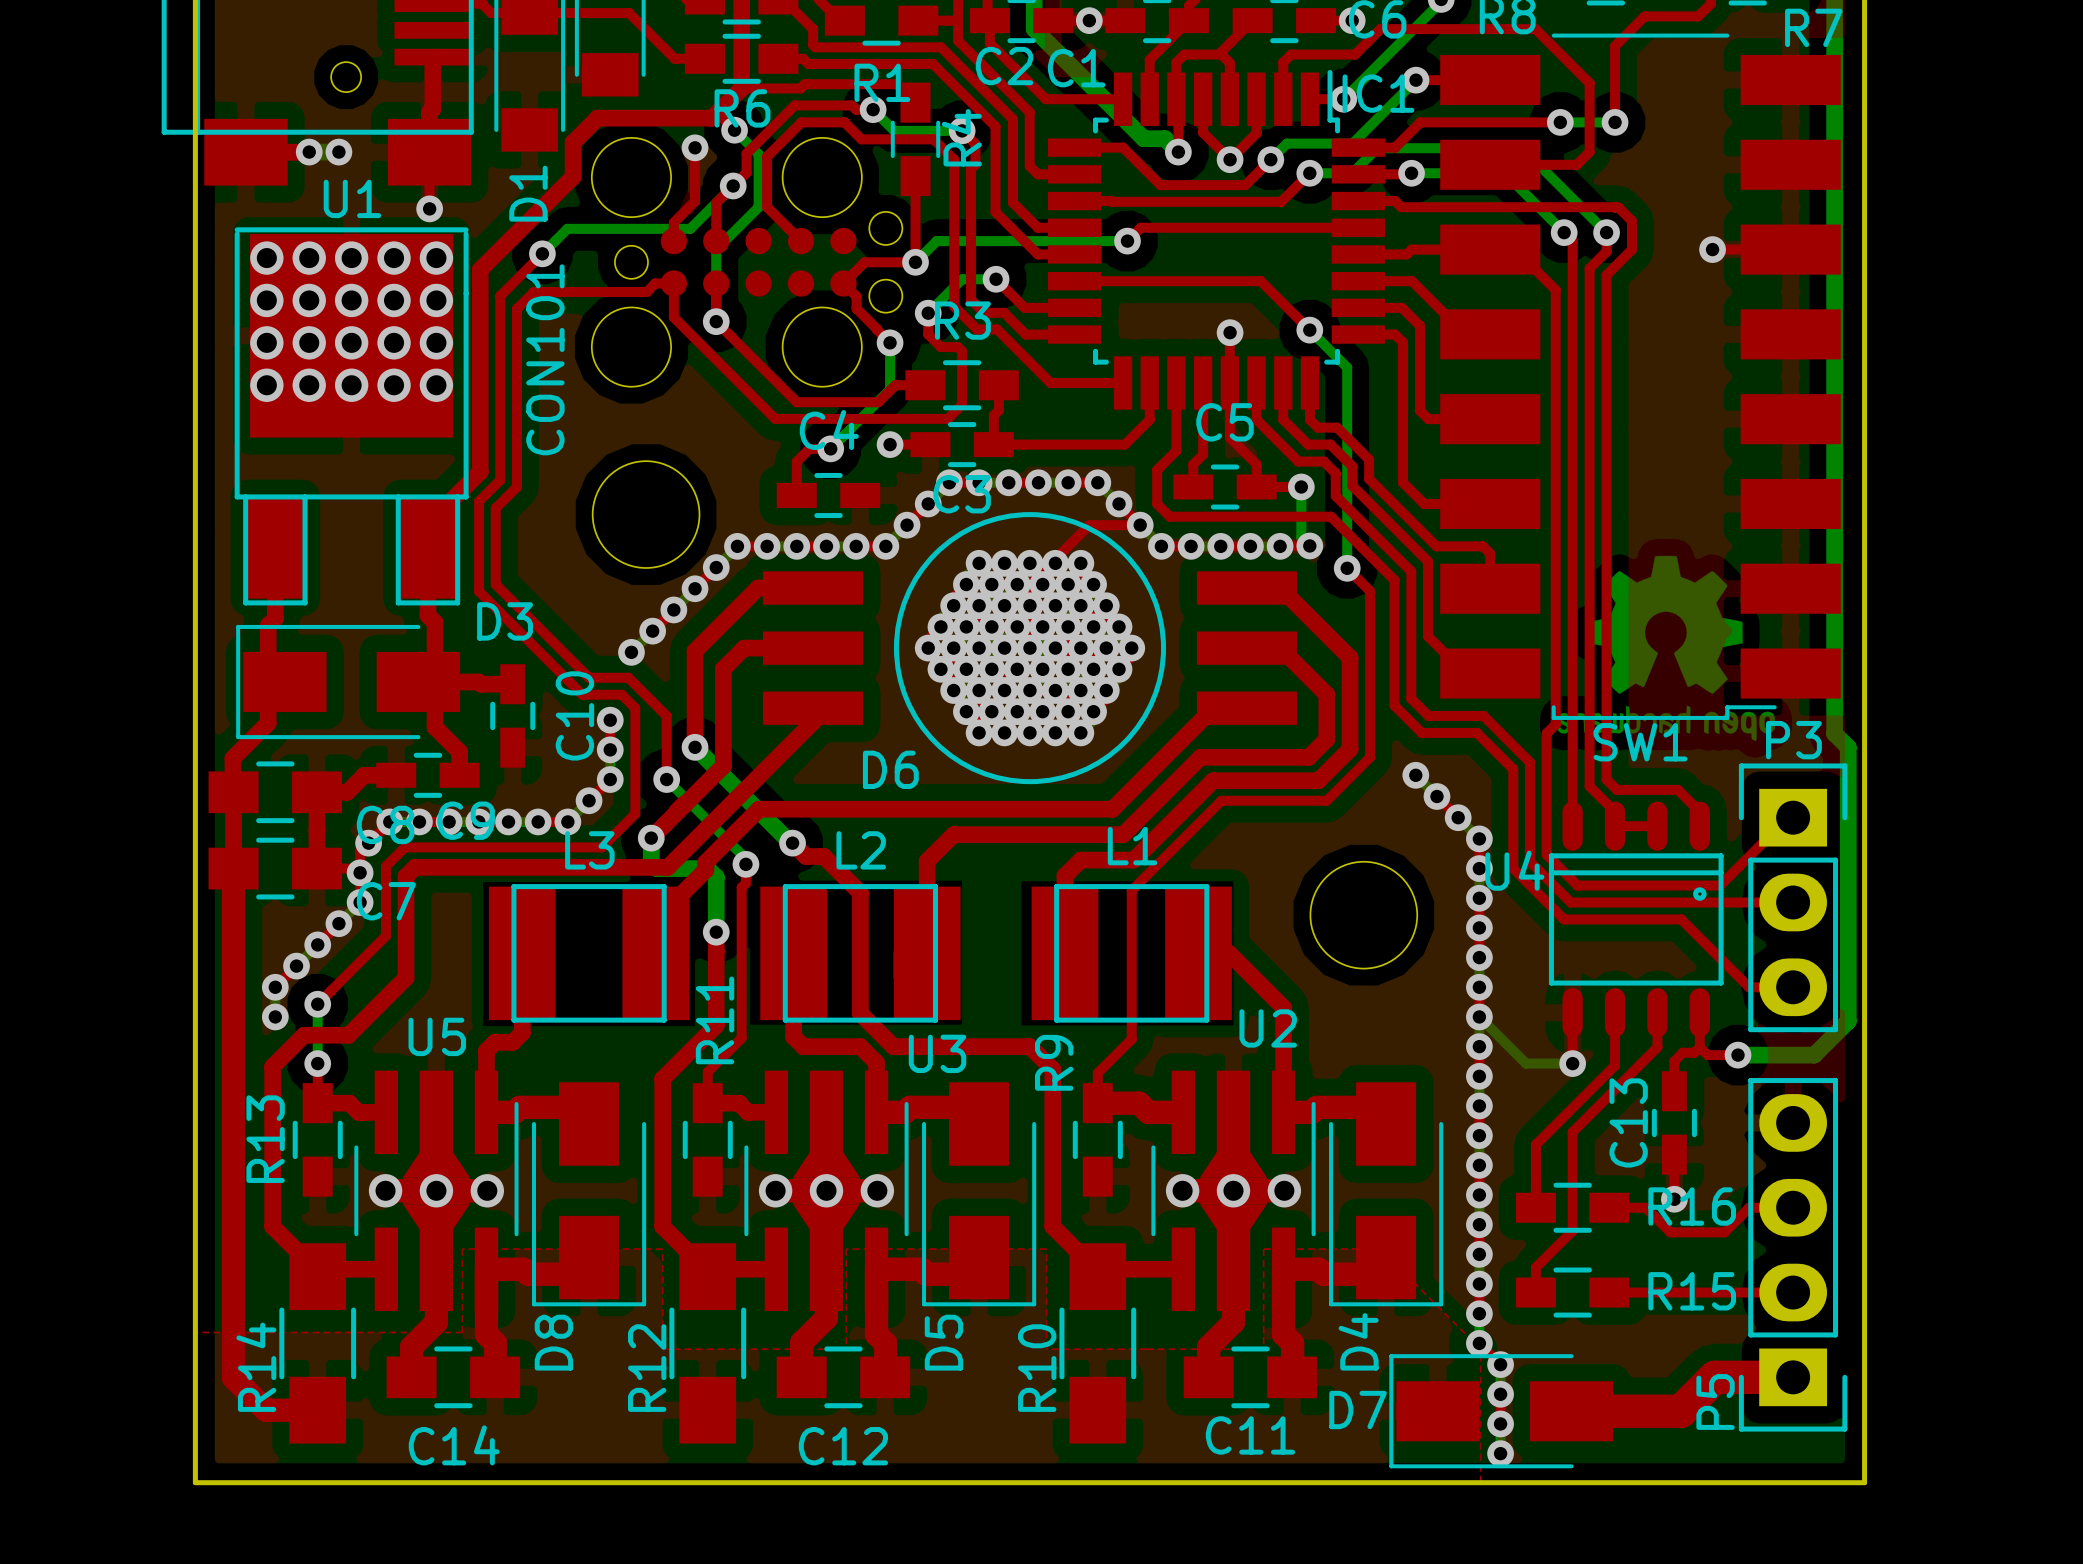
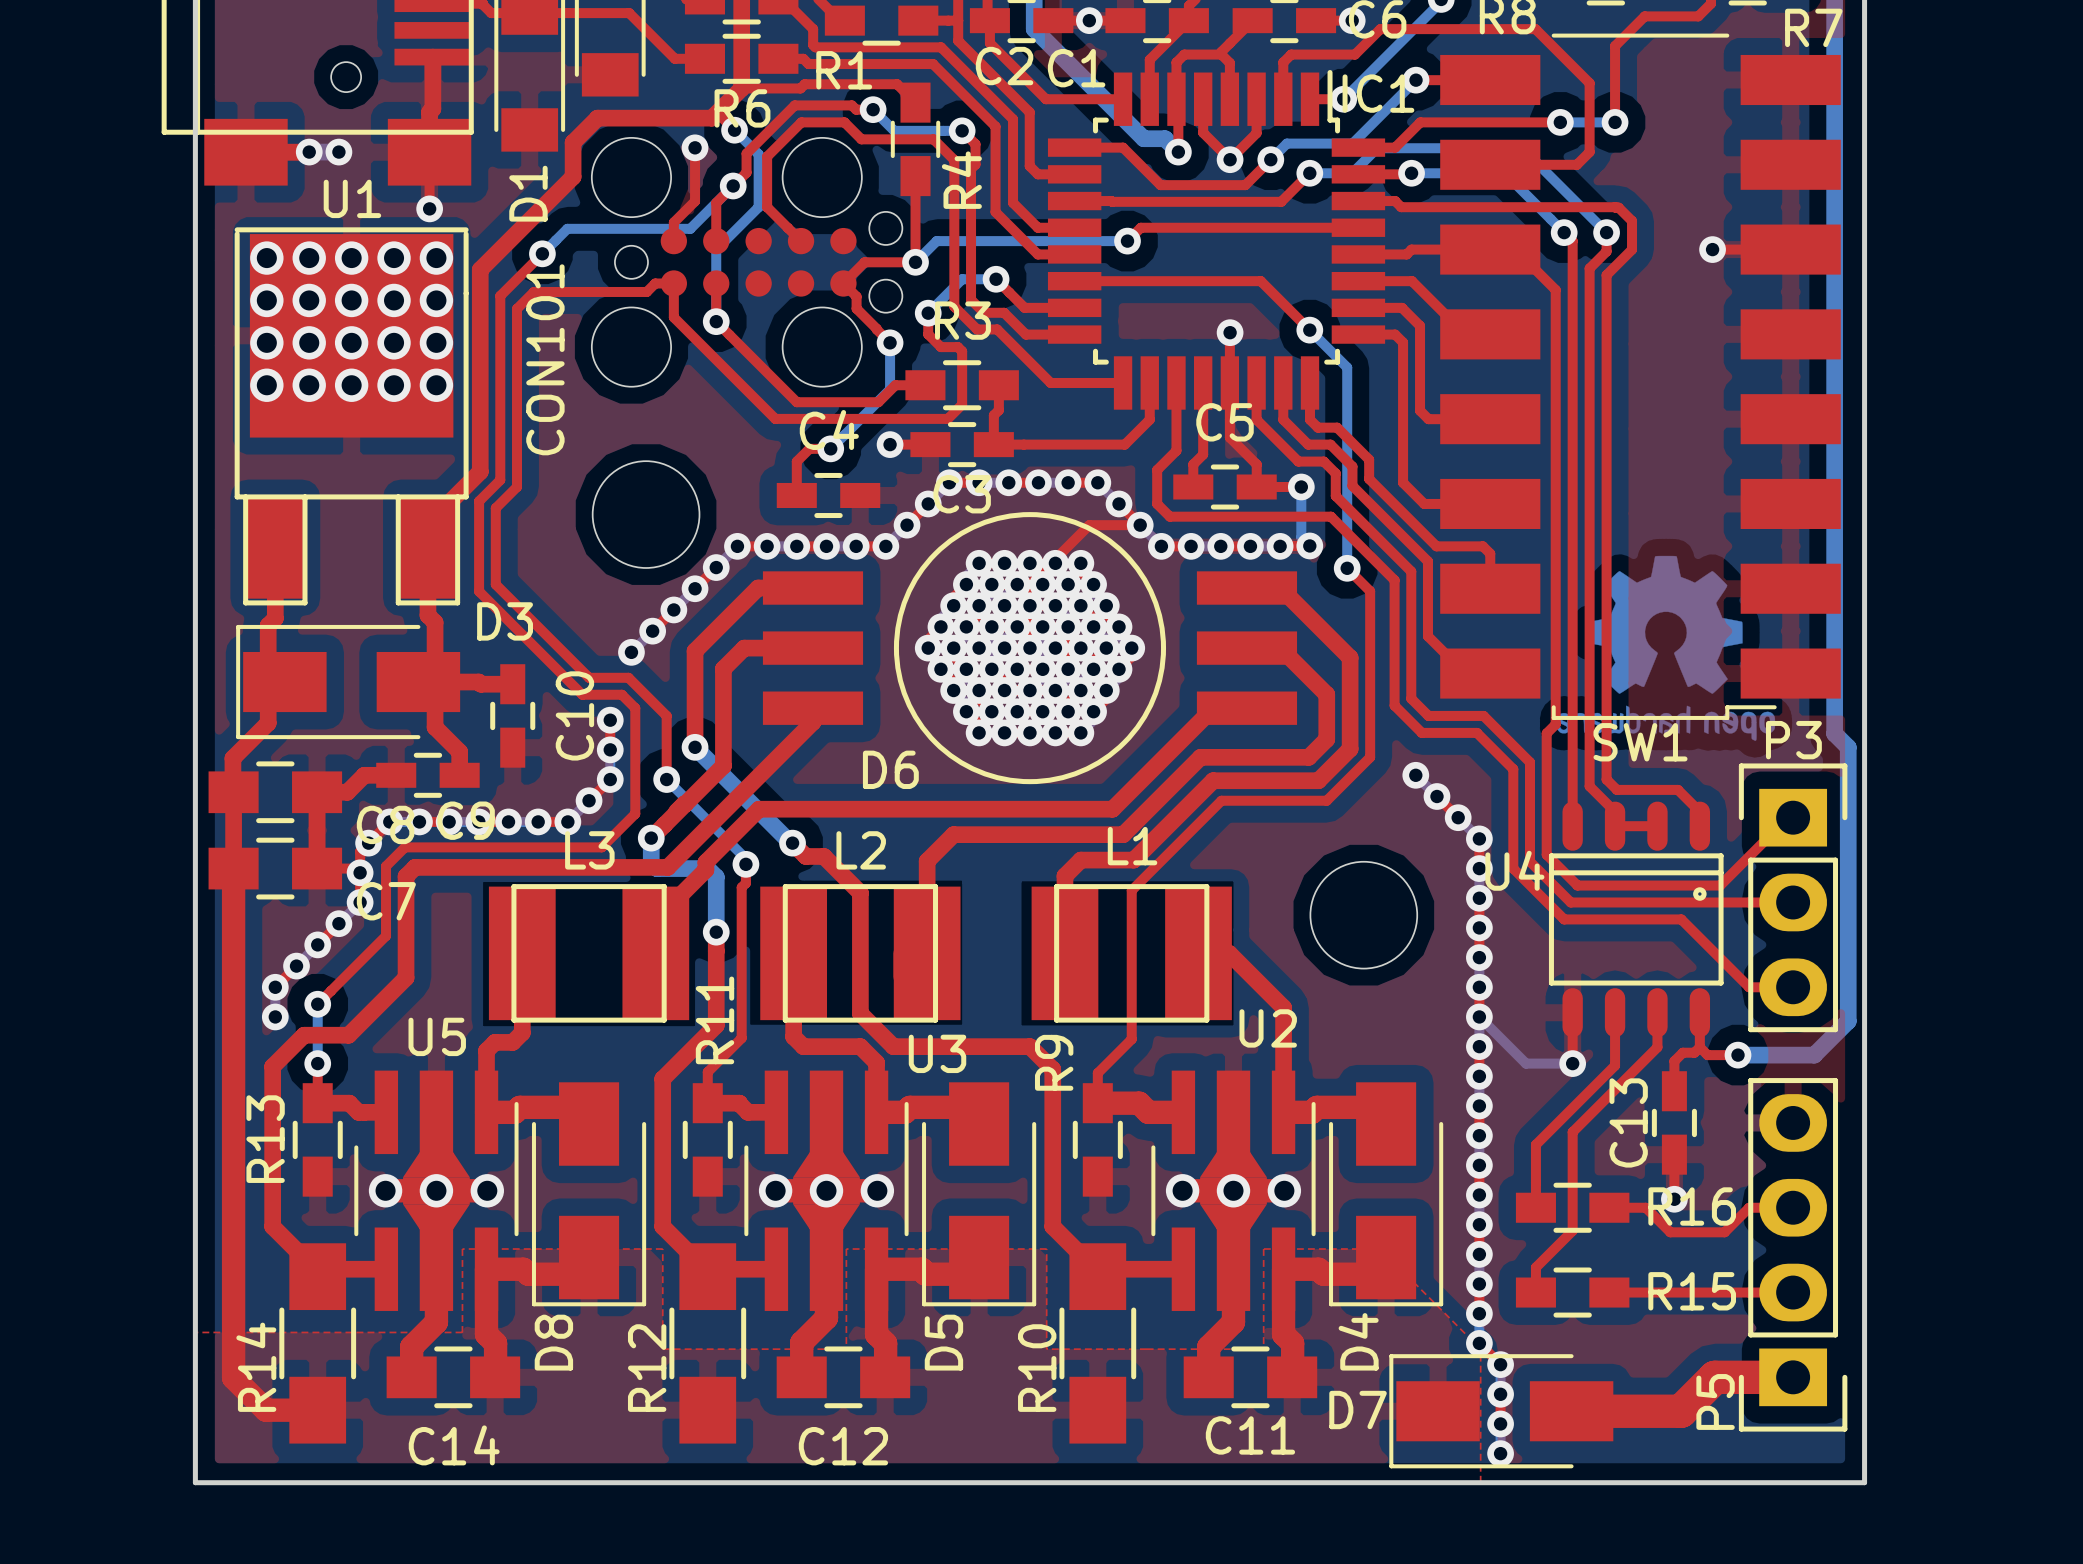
R1 name position: R1 (882, 82) -> R1 (844, 70)
R4 name position: R4 (961, 137) -> R4 (961, 180)

